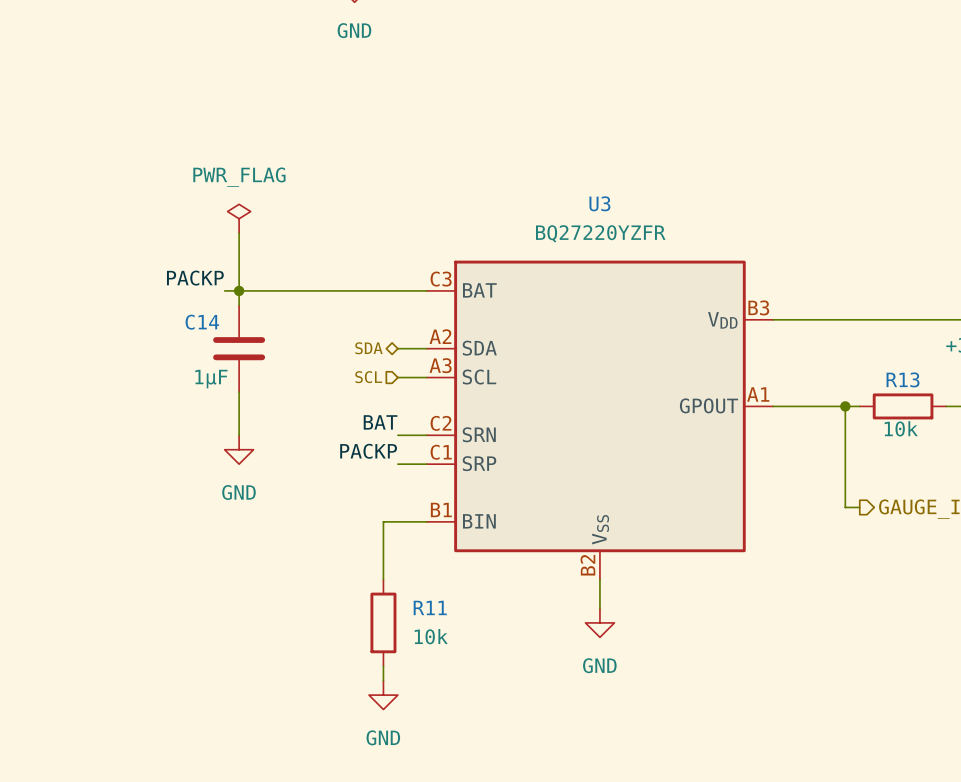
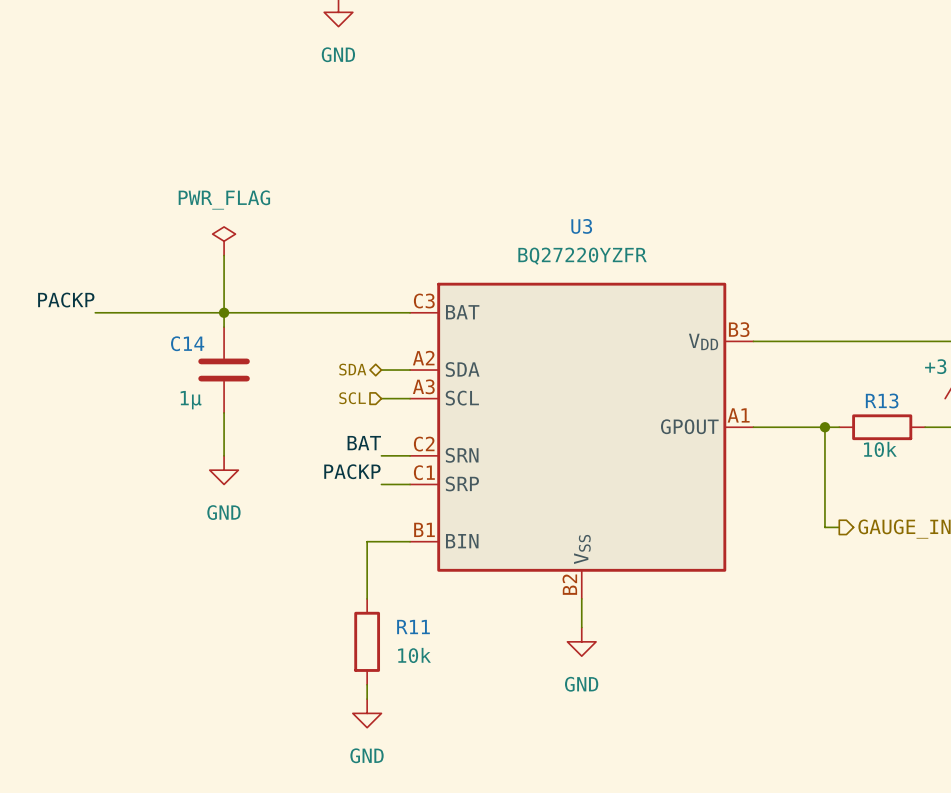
label position: PACKP (195, 278) -> PACKP (66, 300)
wire: none -> (95, 312) (209, 312)
C14 value: 1µF (211, 379) -> 1µ (191, 400)

